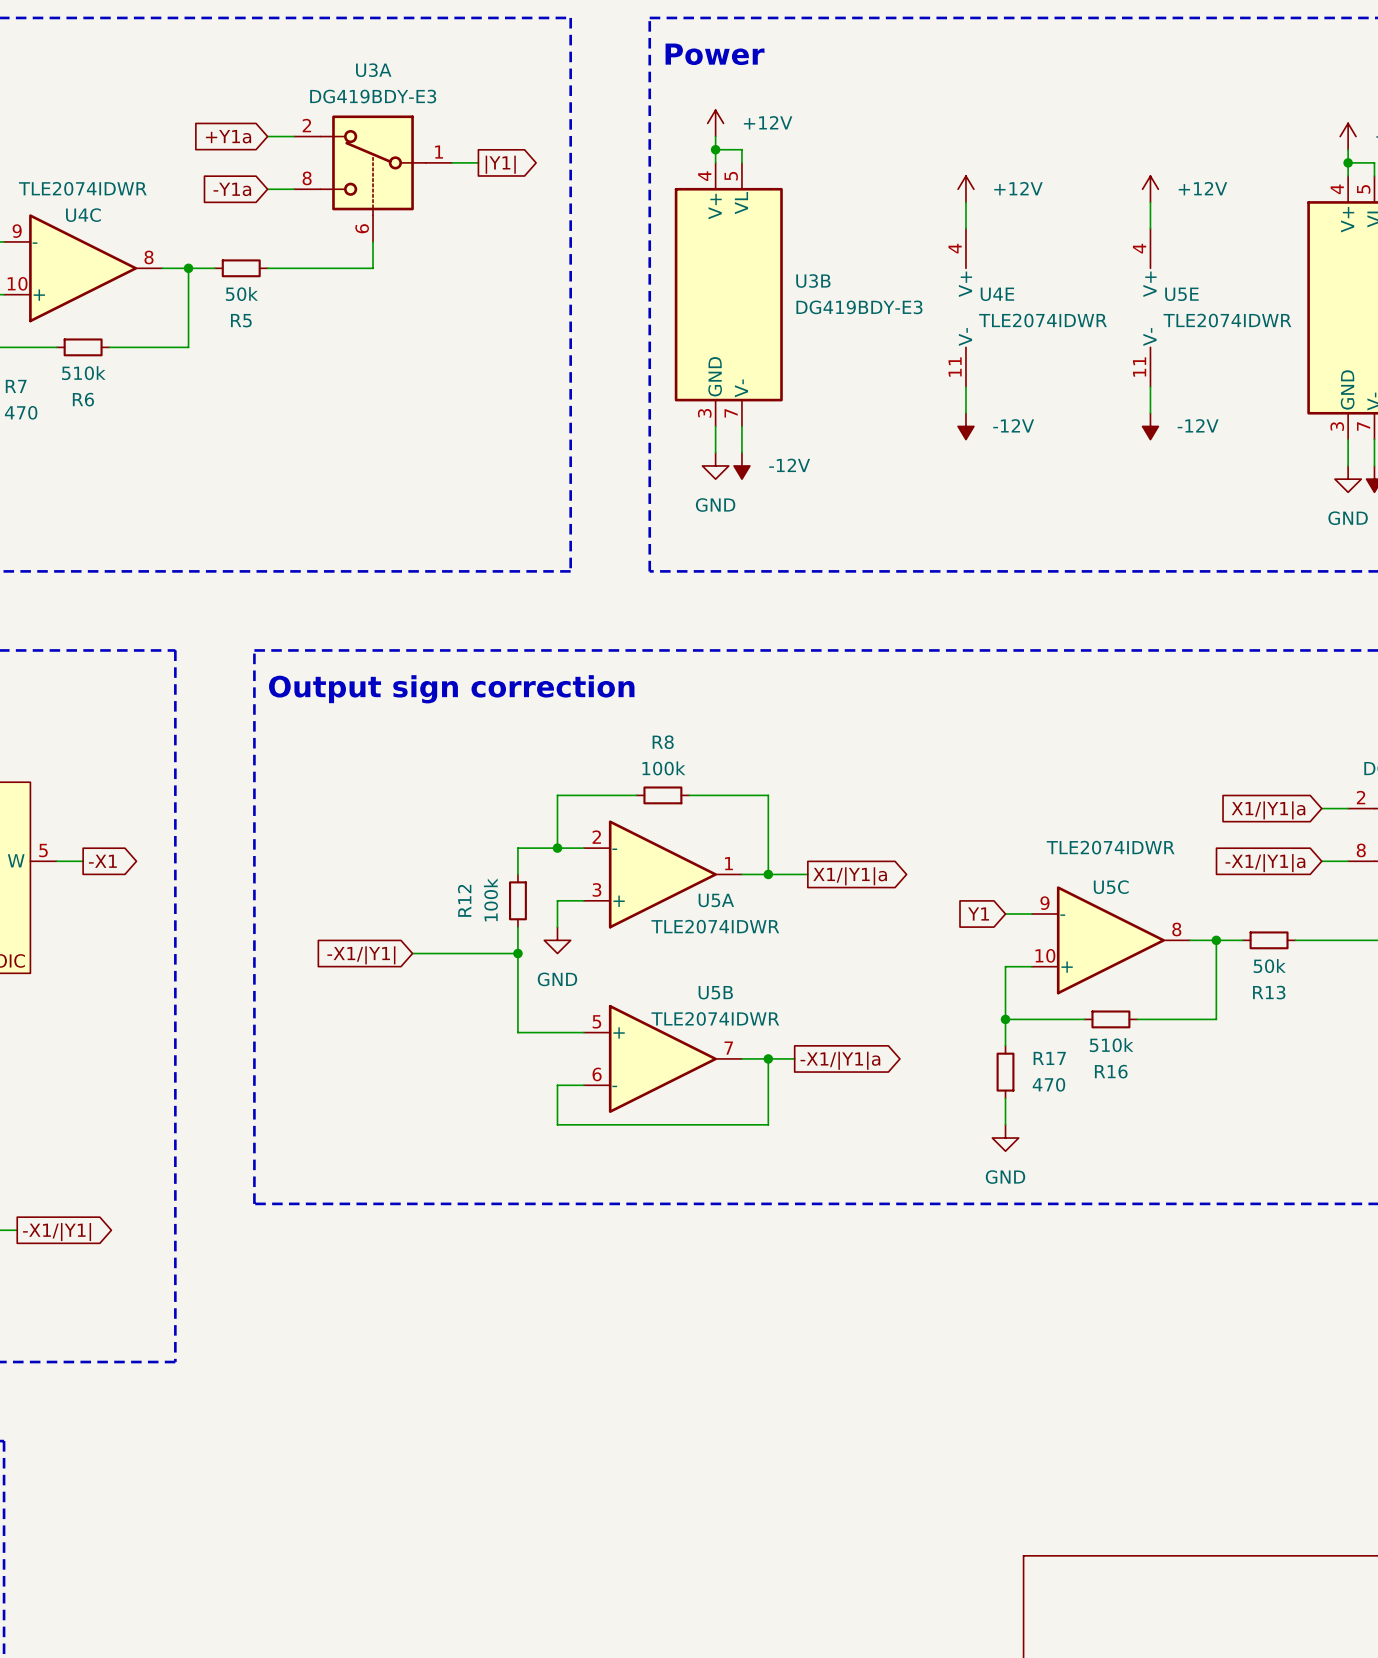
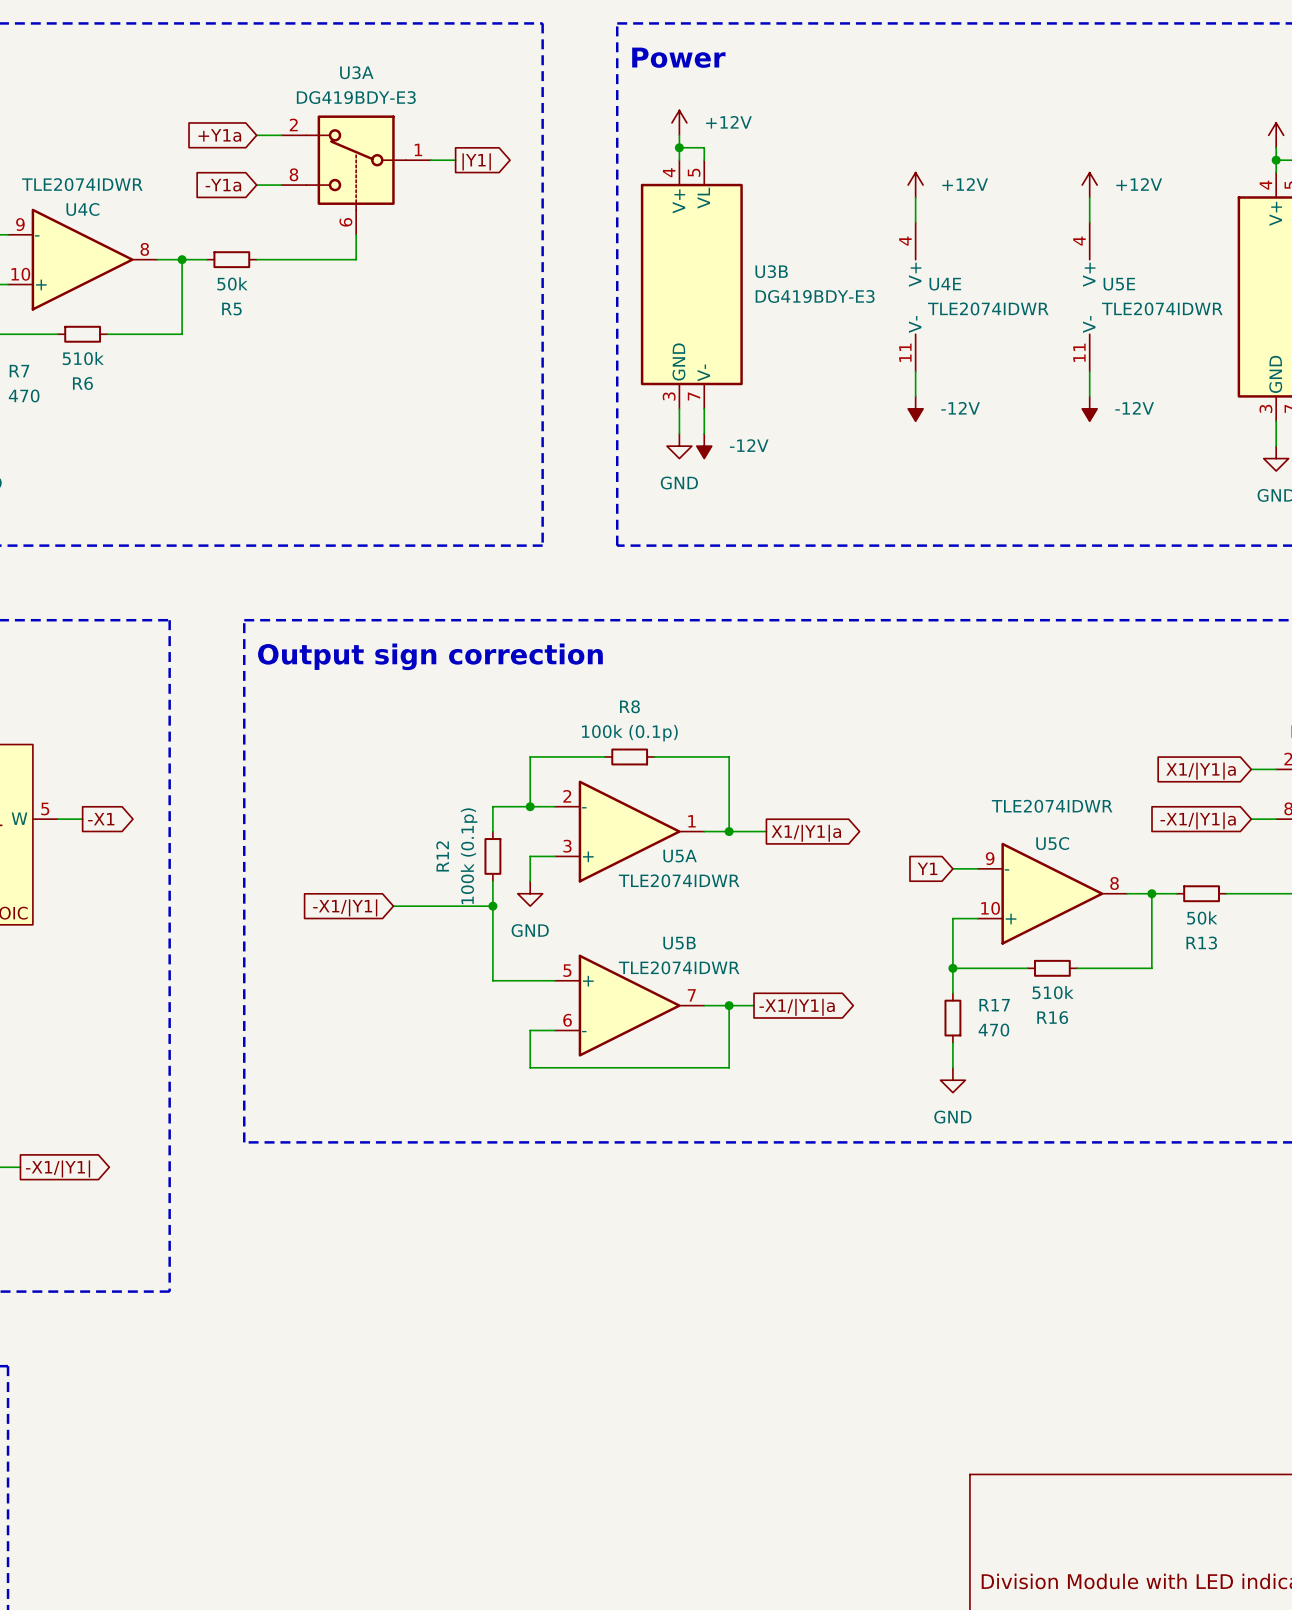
R8 value: 100k (663, 768) -> 100k (0.1p) (629, 733)
R12 value: 100k (490, 899) -> 100k (0.1p) (469, 856)

